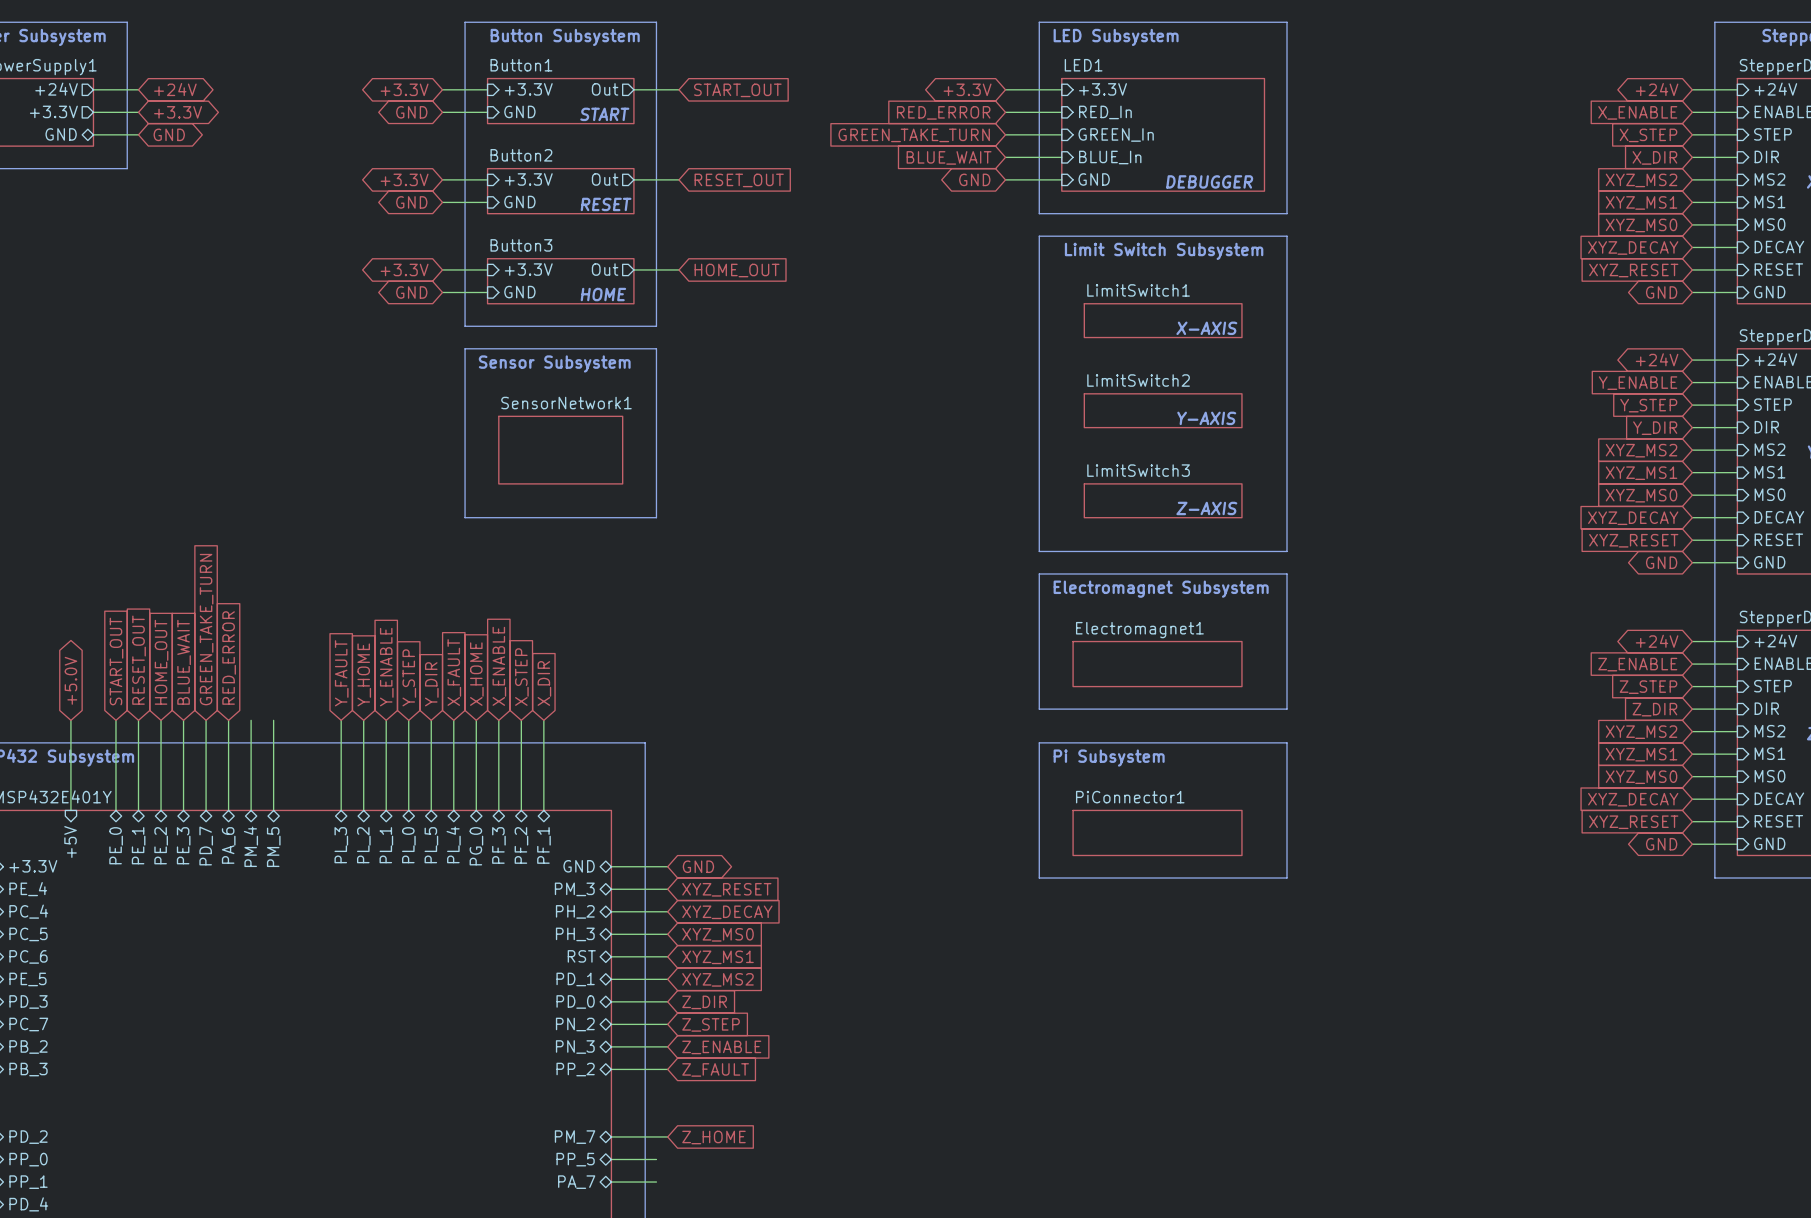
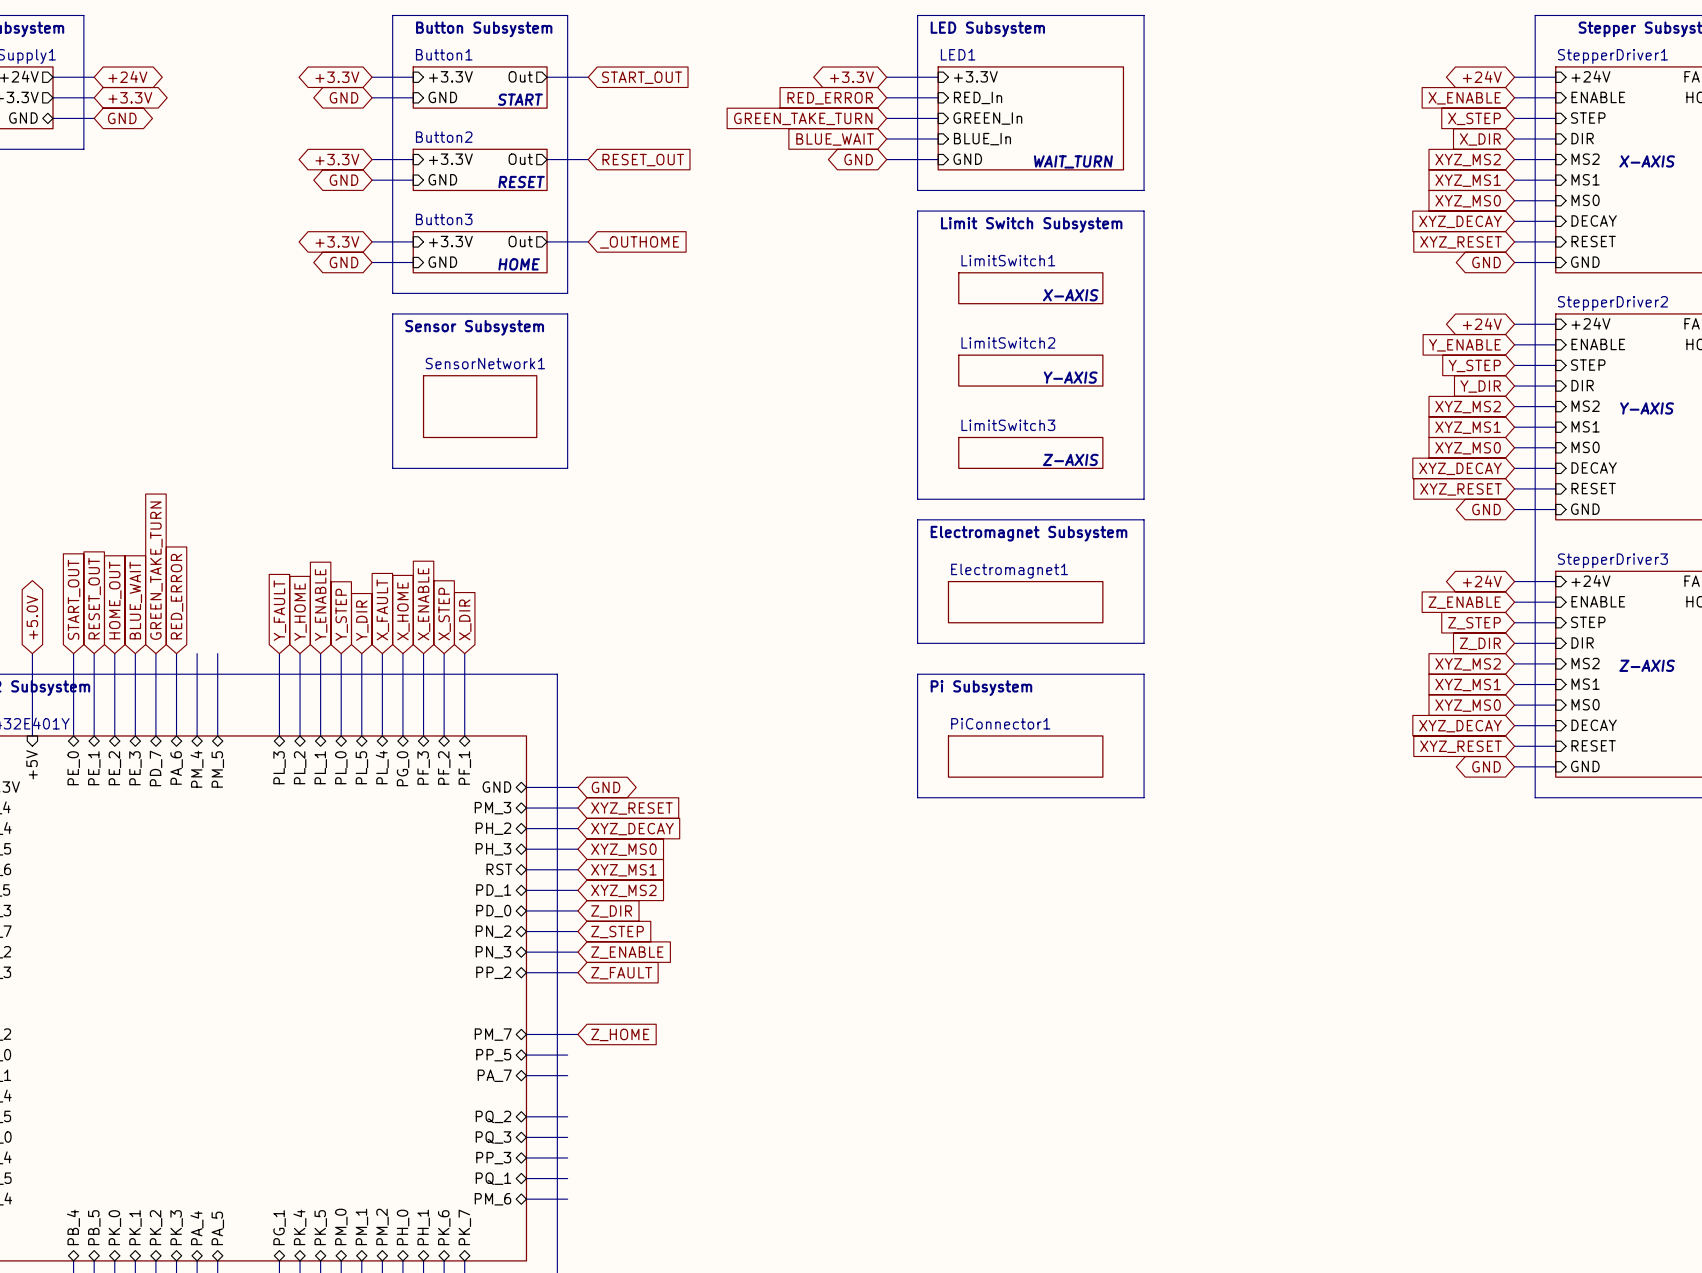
text: DEBUGGER (1209, 181) -> WAIT_TURN (1073, 161)
global label: HOME_OUT (737, 270) -> _OUTHOME (639, 242)

